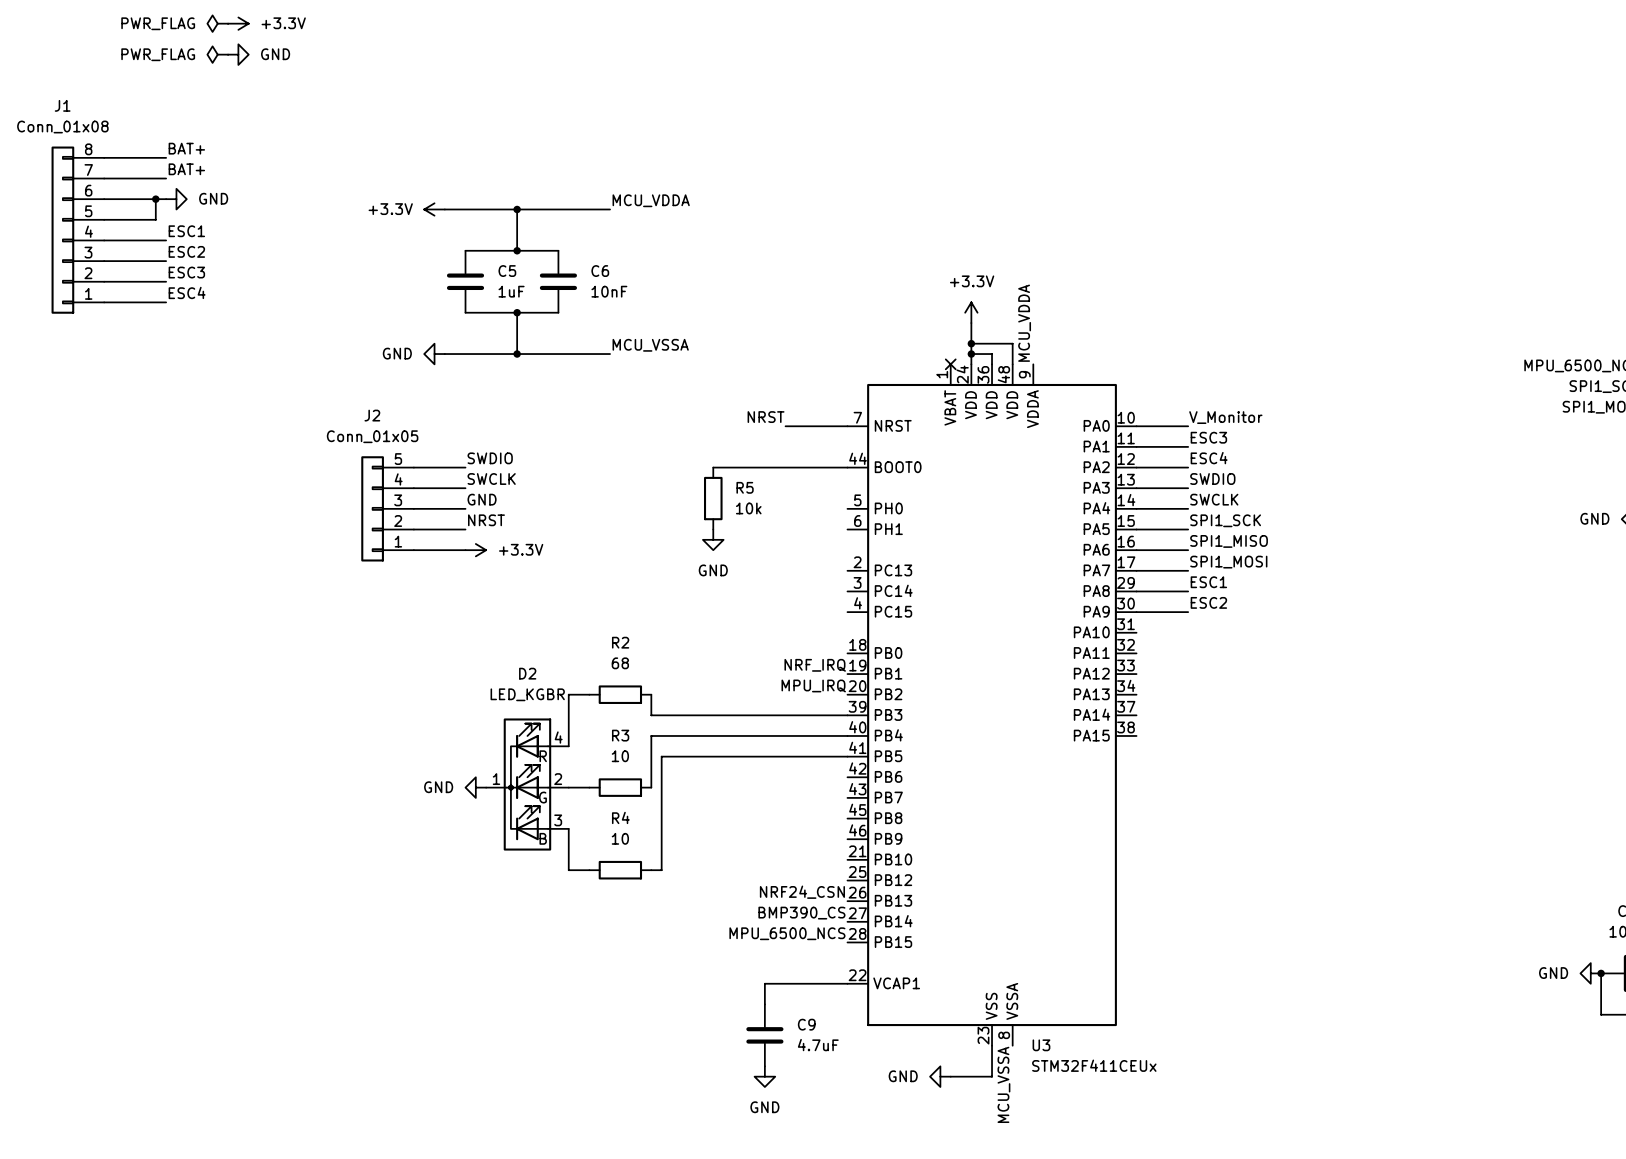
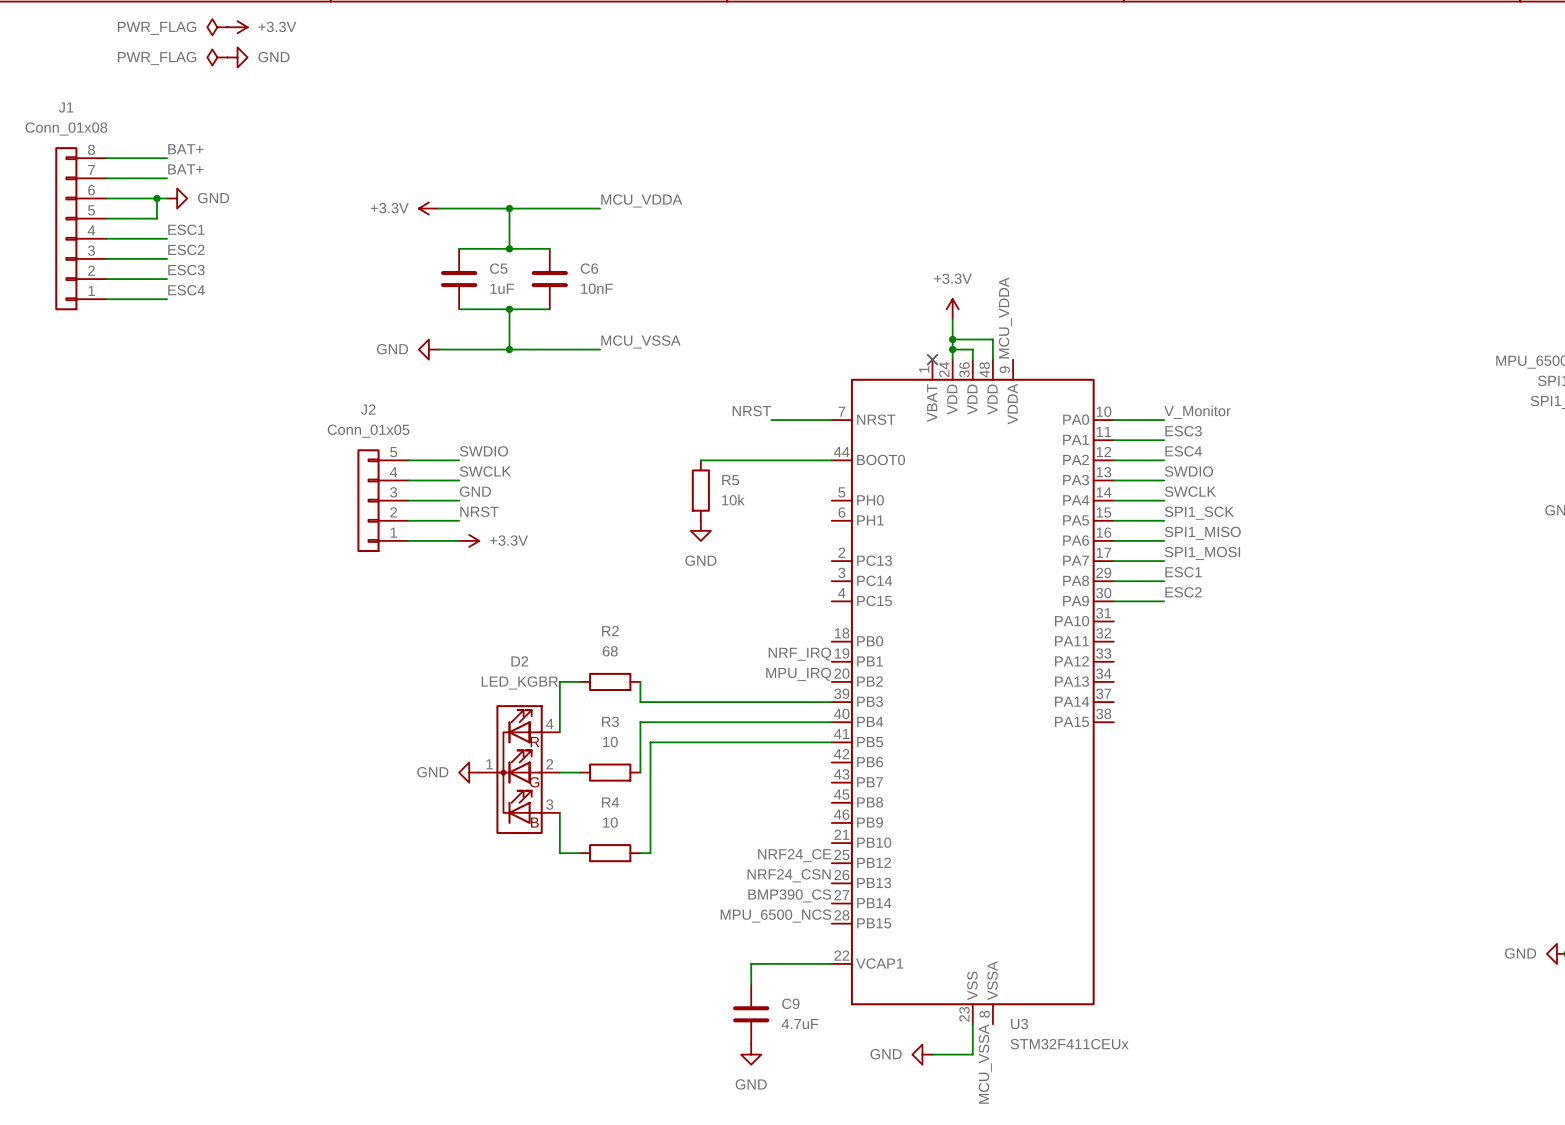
label: none -> NRF24_CE (794, 855)

